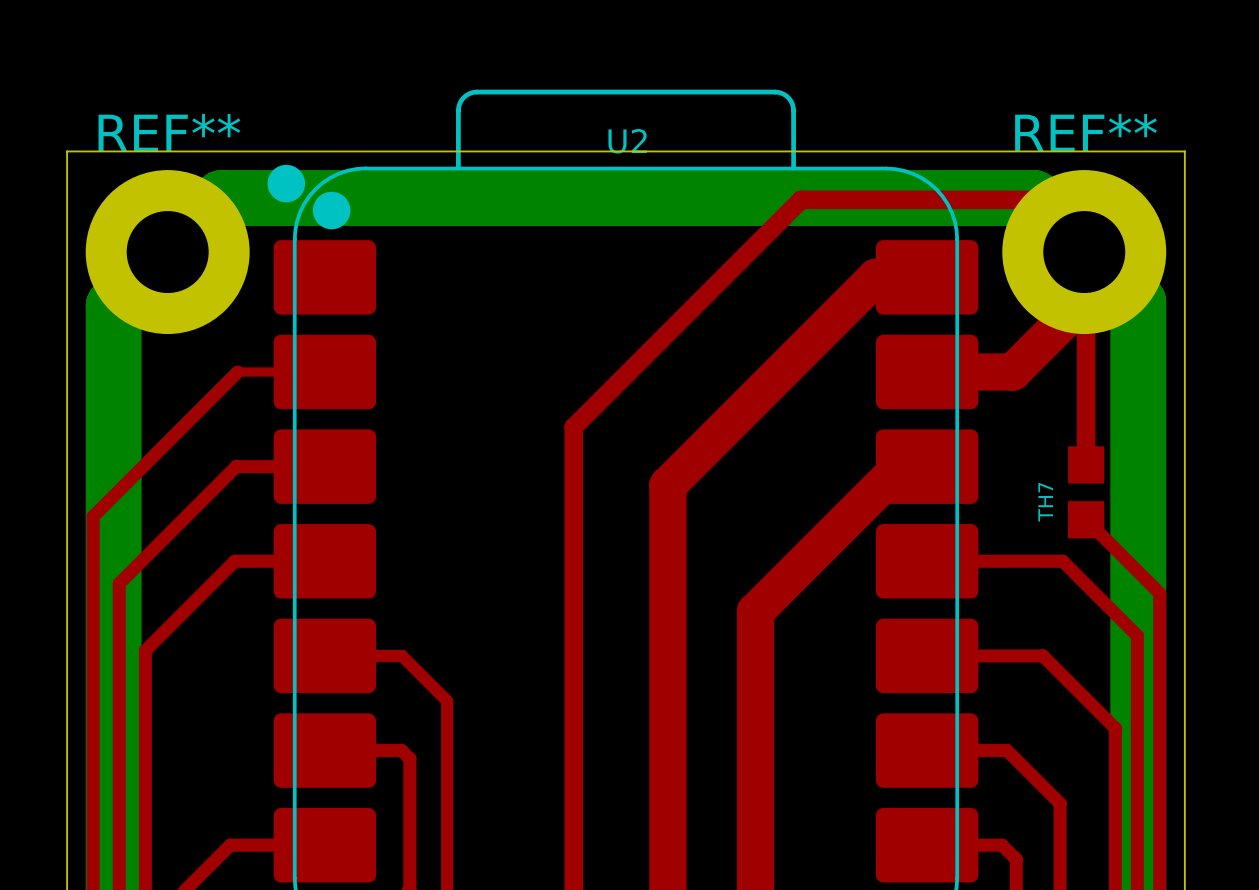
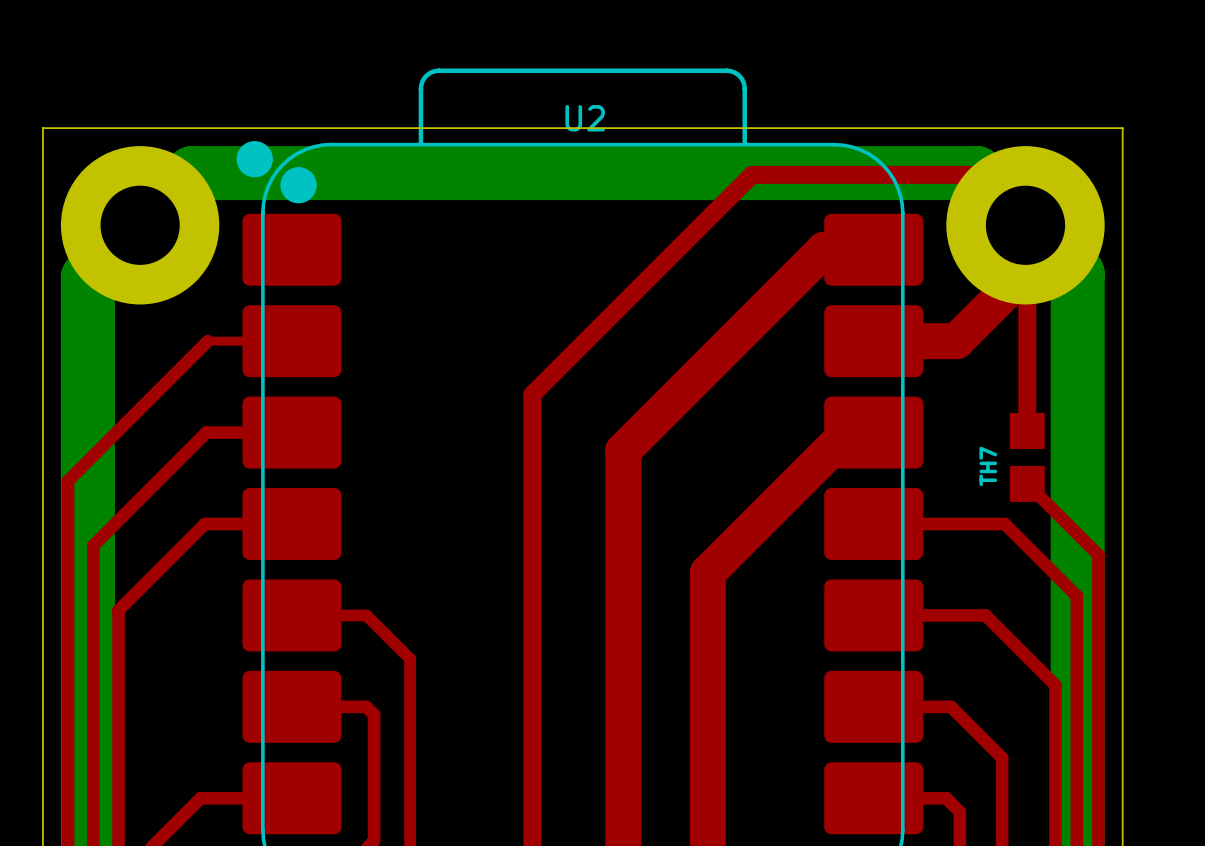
REF** name: REF** (169, 132) -> none
REF** name: REF** (1086, 132) -> none

